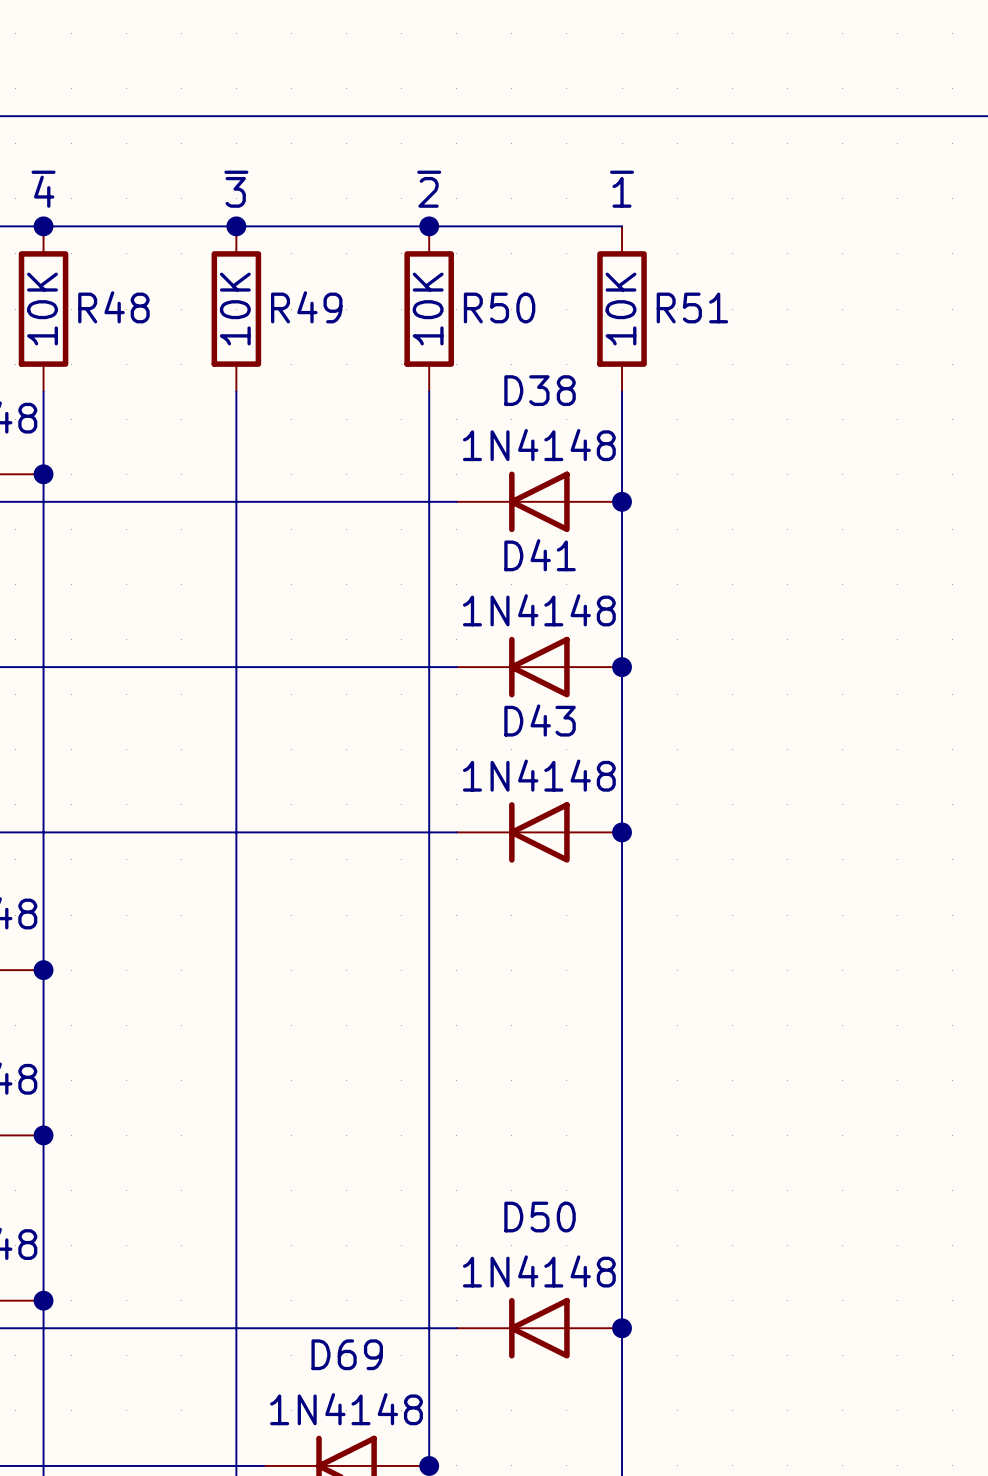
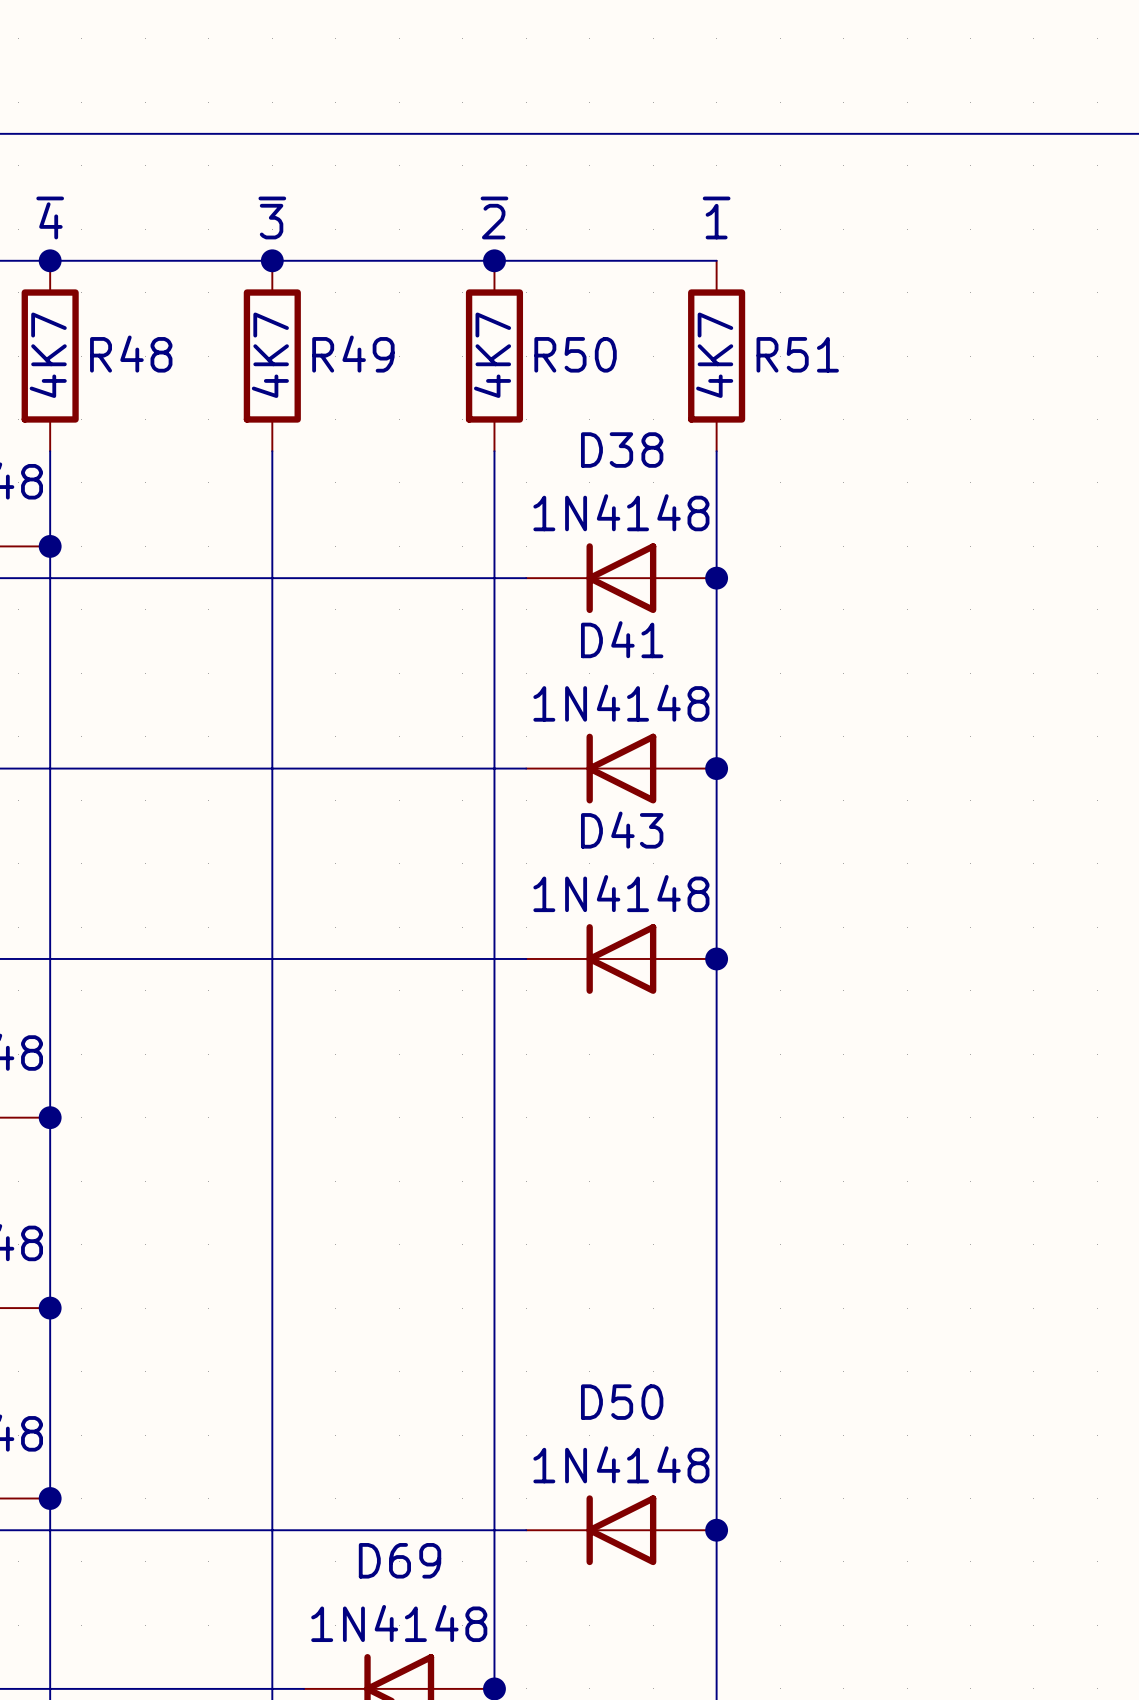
R48 value: 10K (42, 309) -> 4K7 (48, 355)
R49 value: 10K (235, 309) -> 4K7 (270, 355)
R50 value: 10K (428, 309) -> 4K7 (492, 355)
R51 value: 10K (620, 309) -> 4K7 (714, 355)

